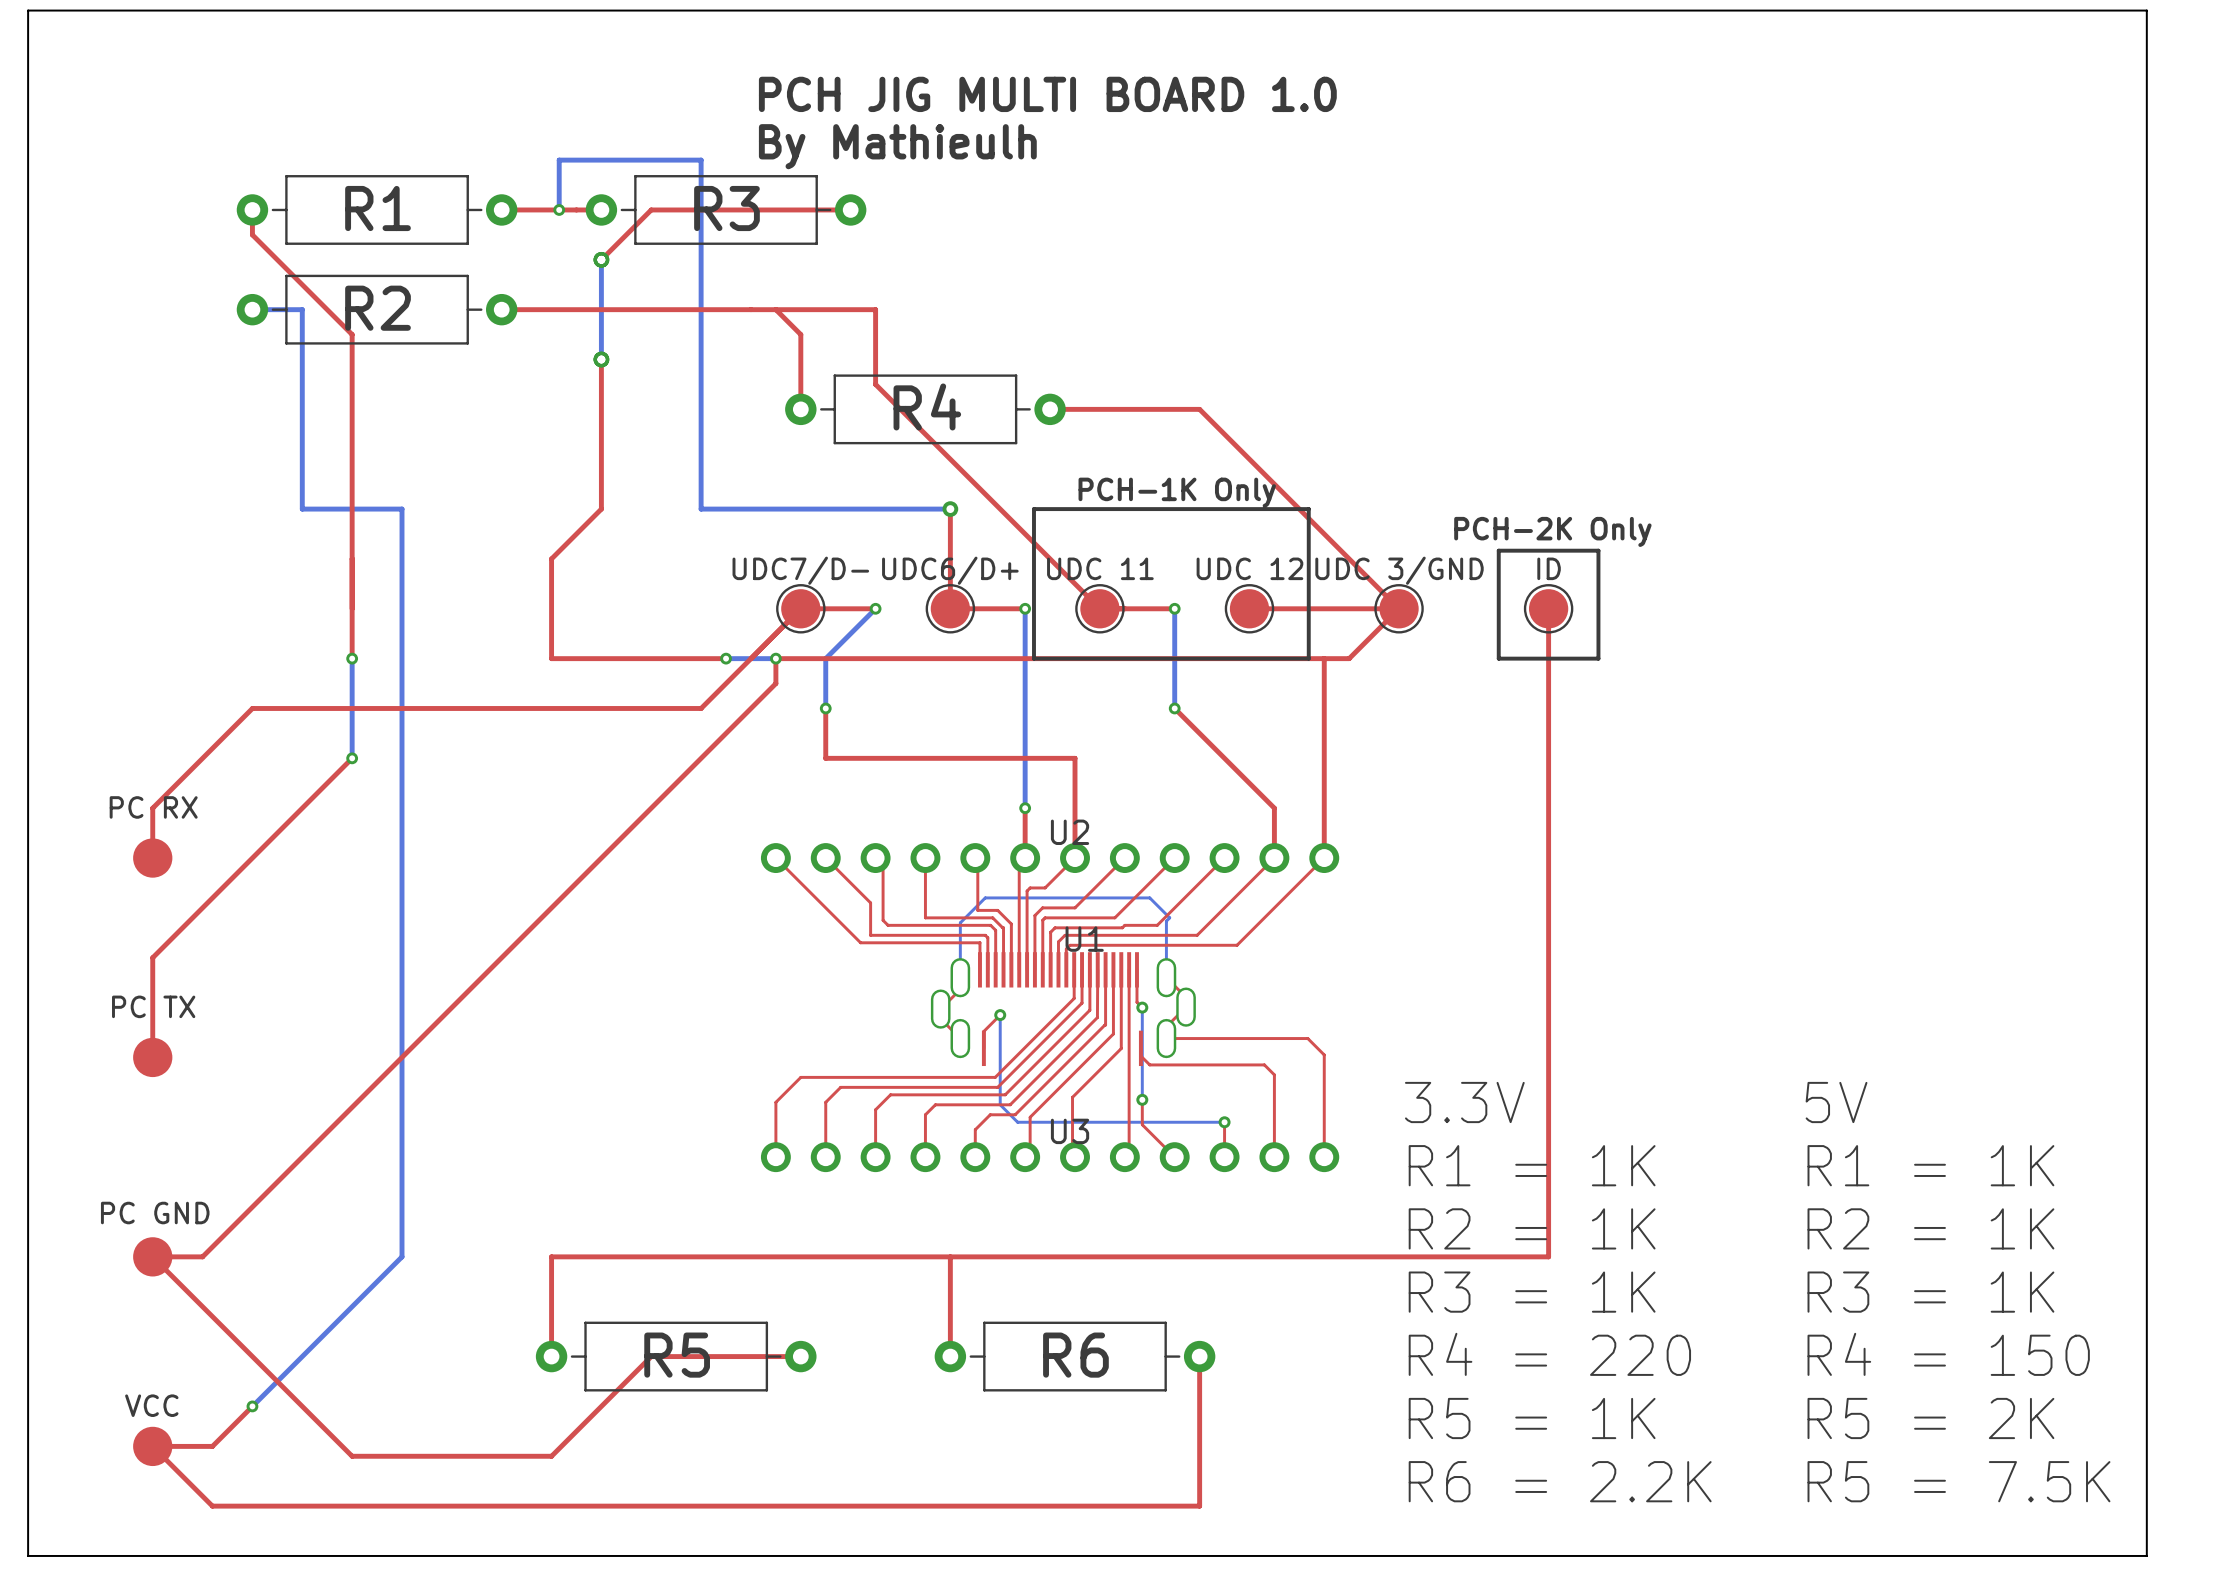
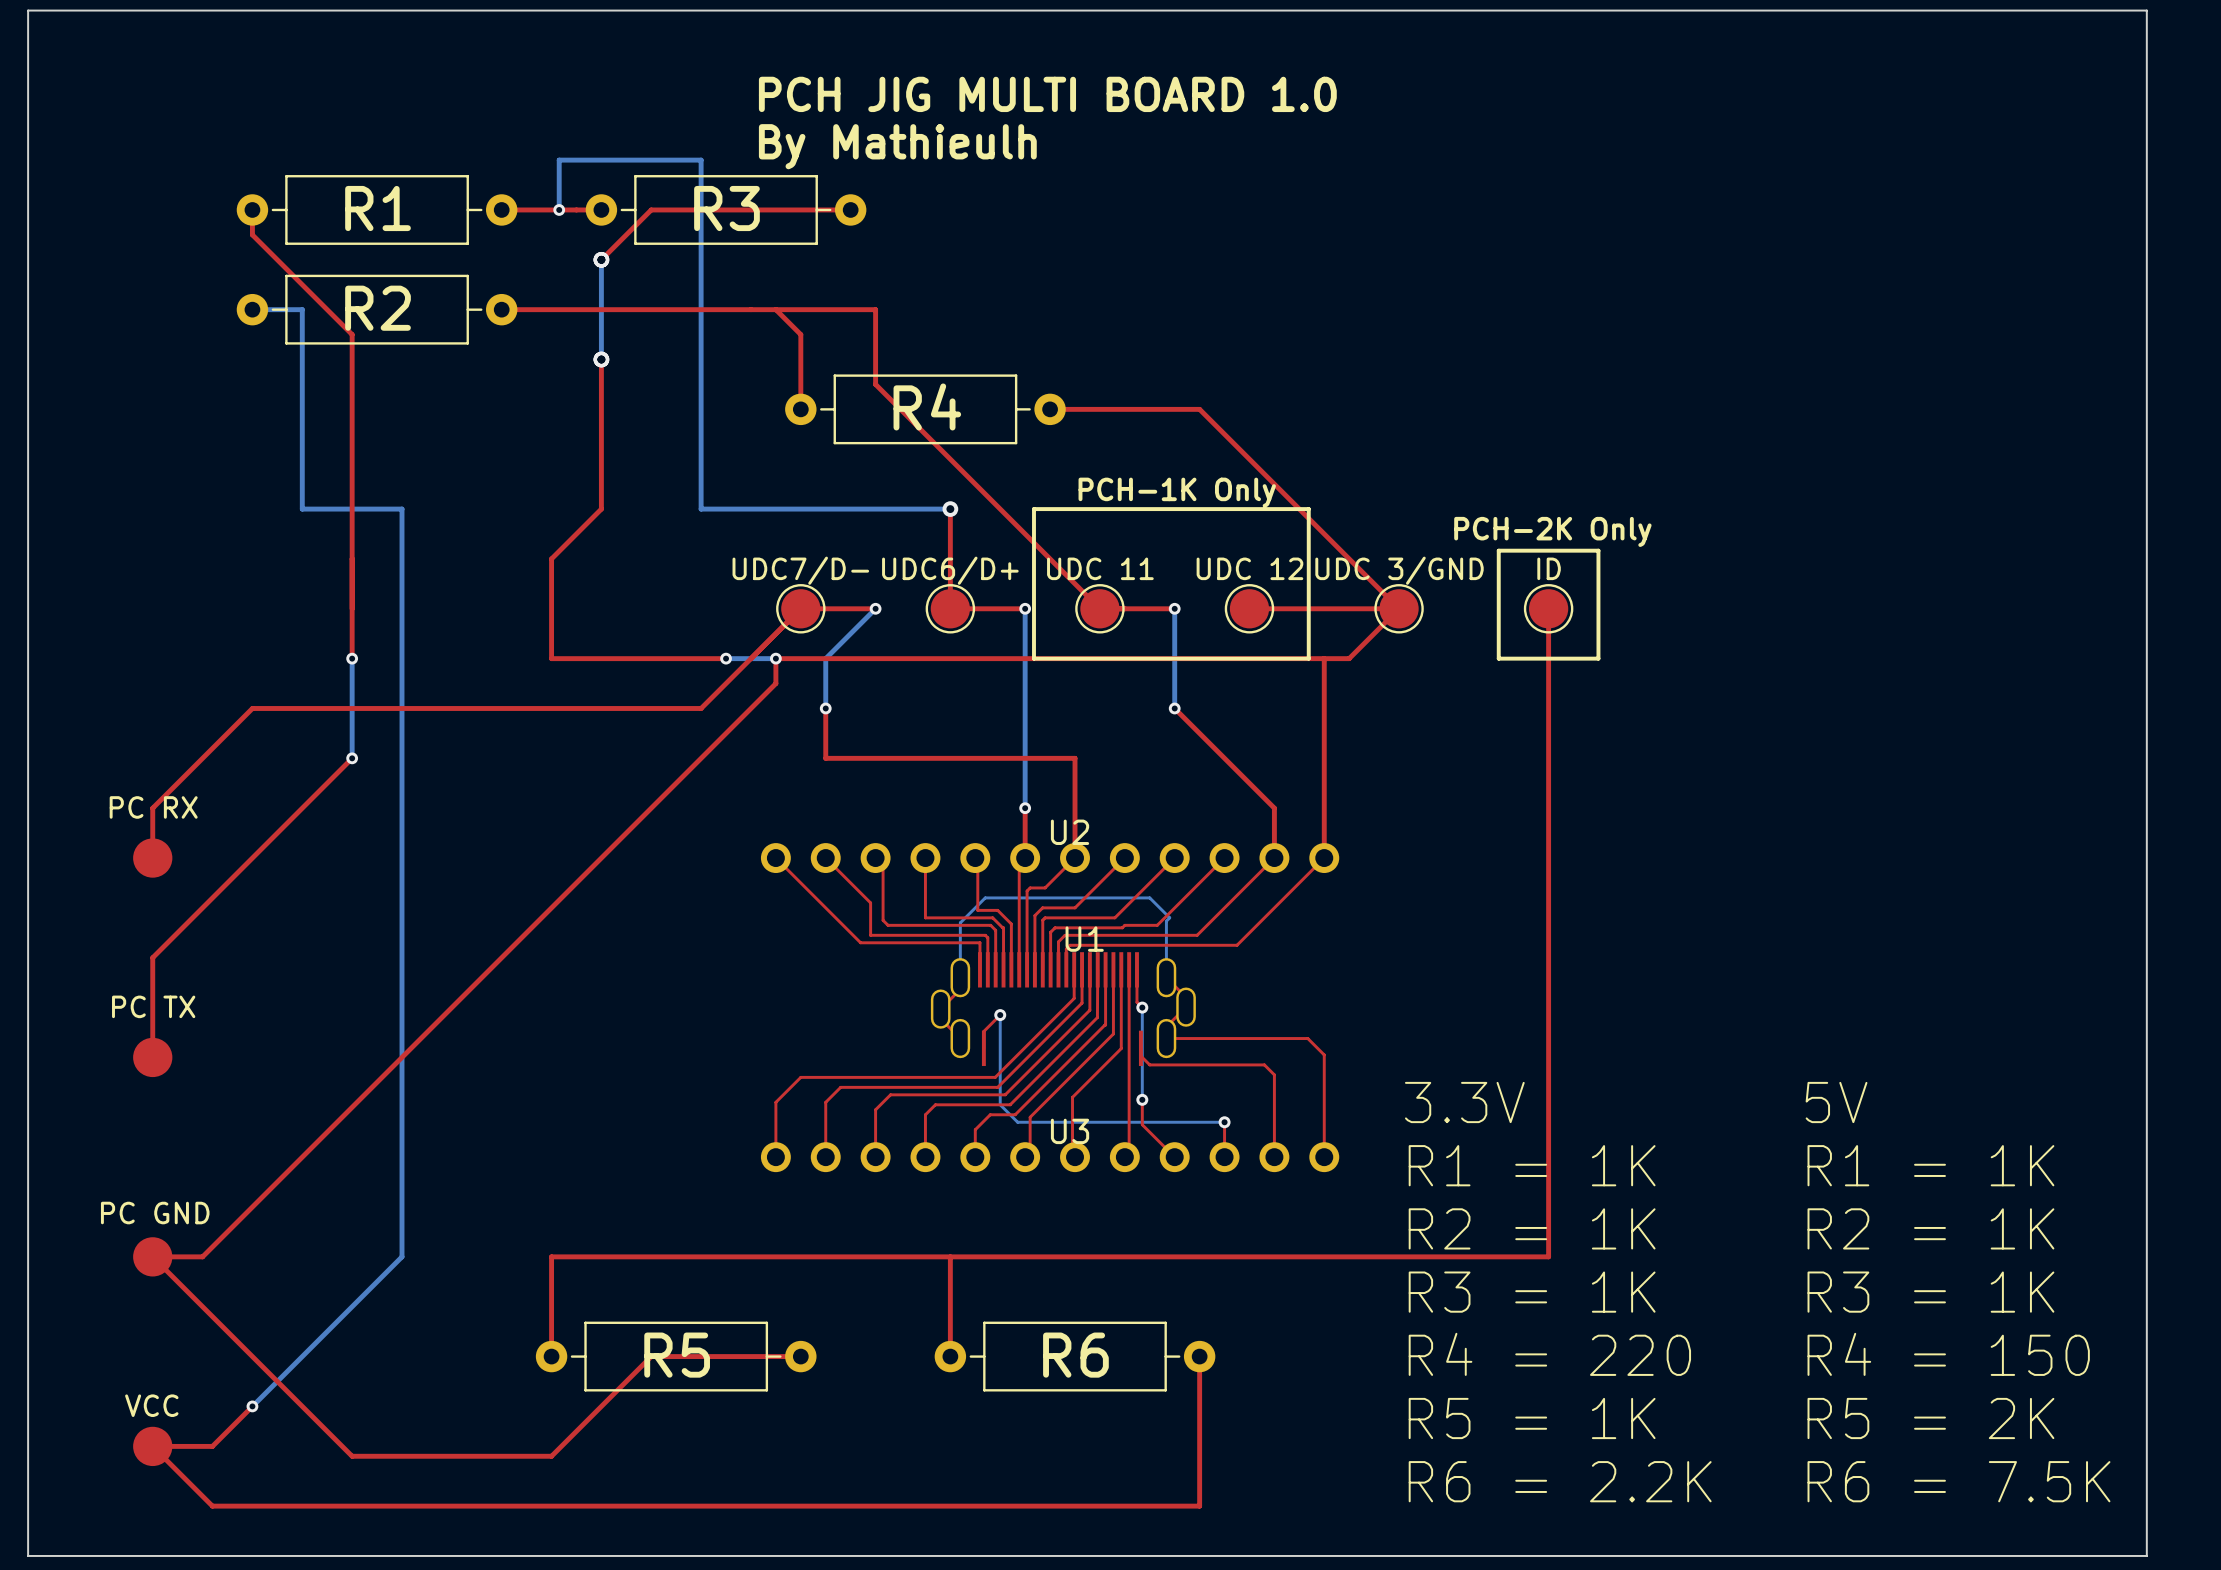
text: R5 = 7.5K (1958, 1481) -> R6 = 7.5K (1958, 1481)

